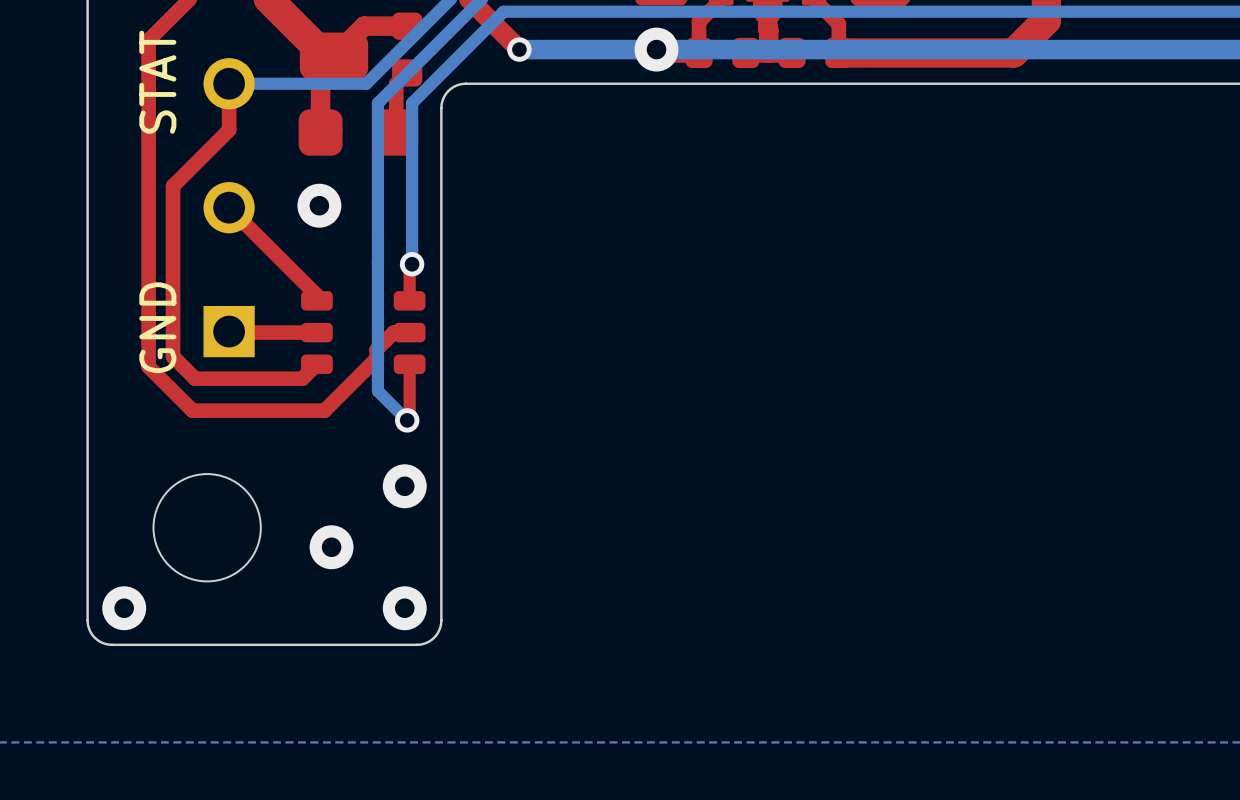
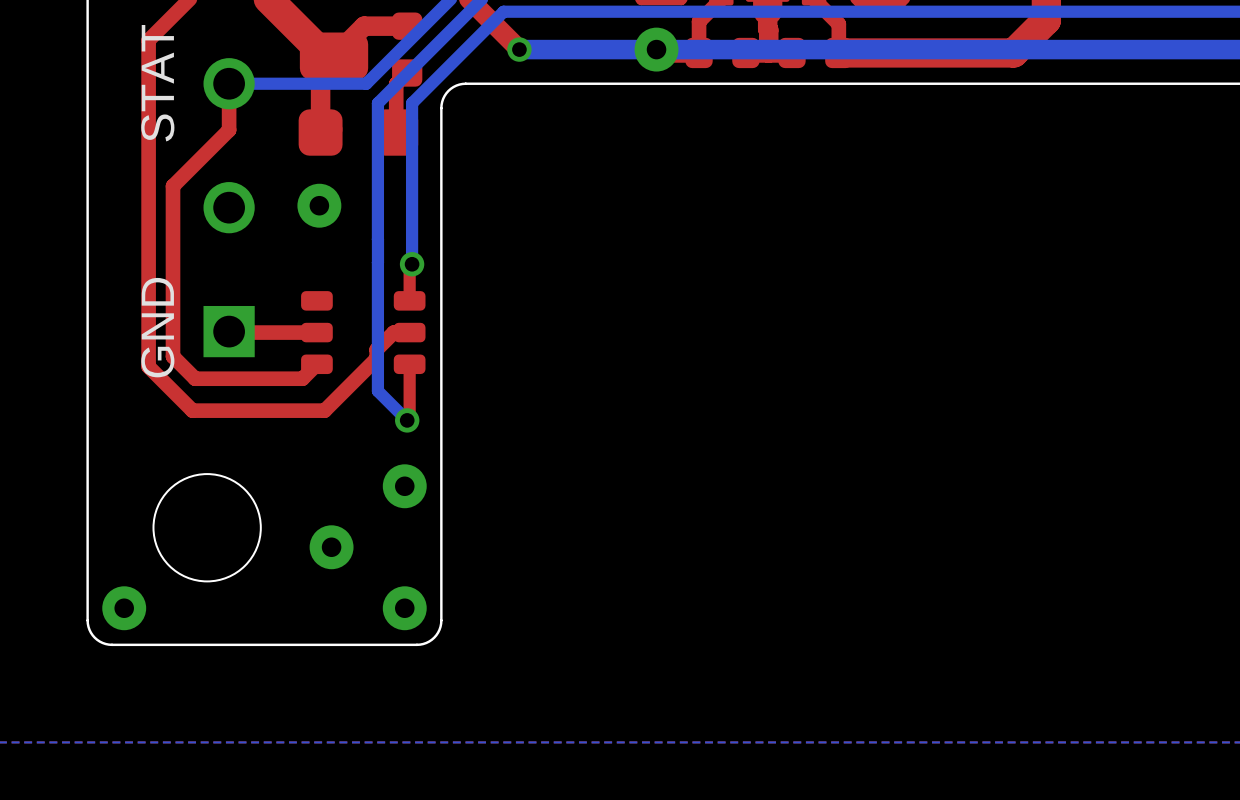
top track: (229, 207) (316, 295) (316, 300) -> none

